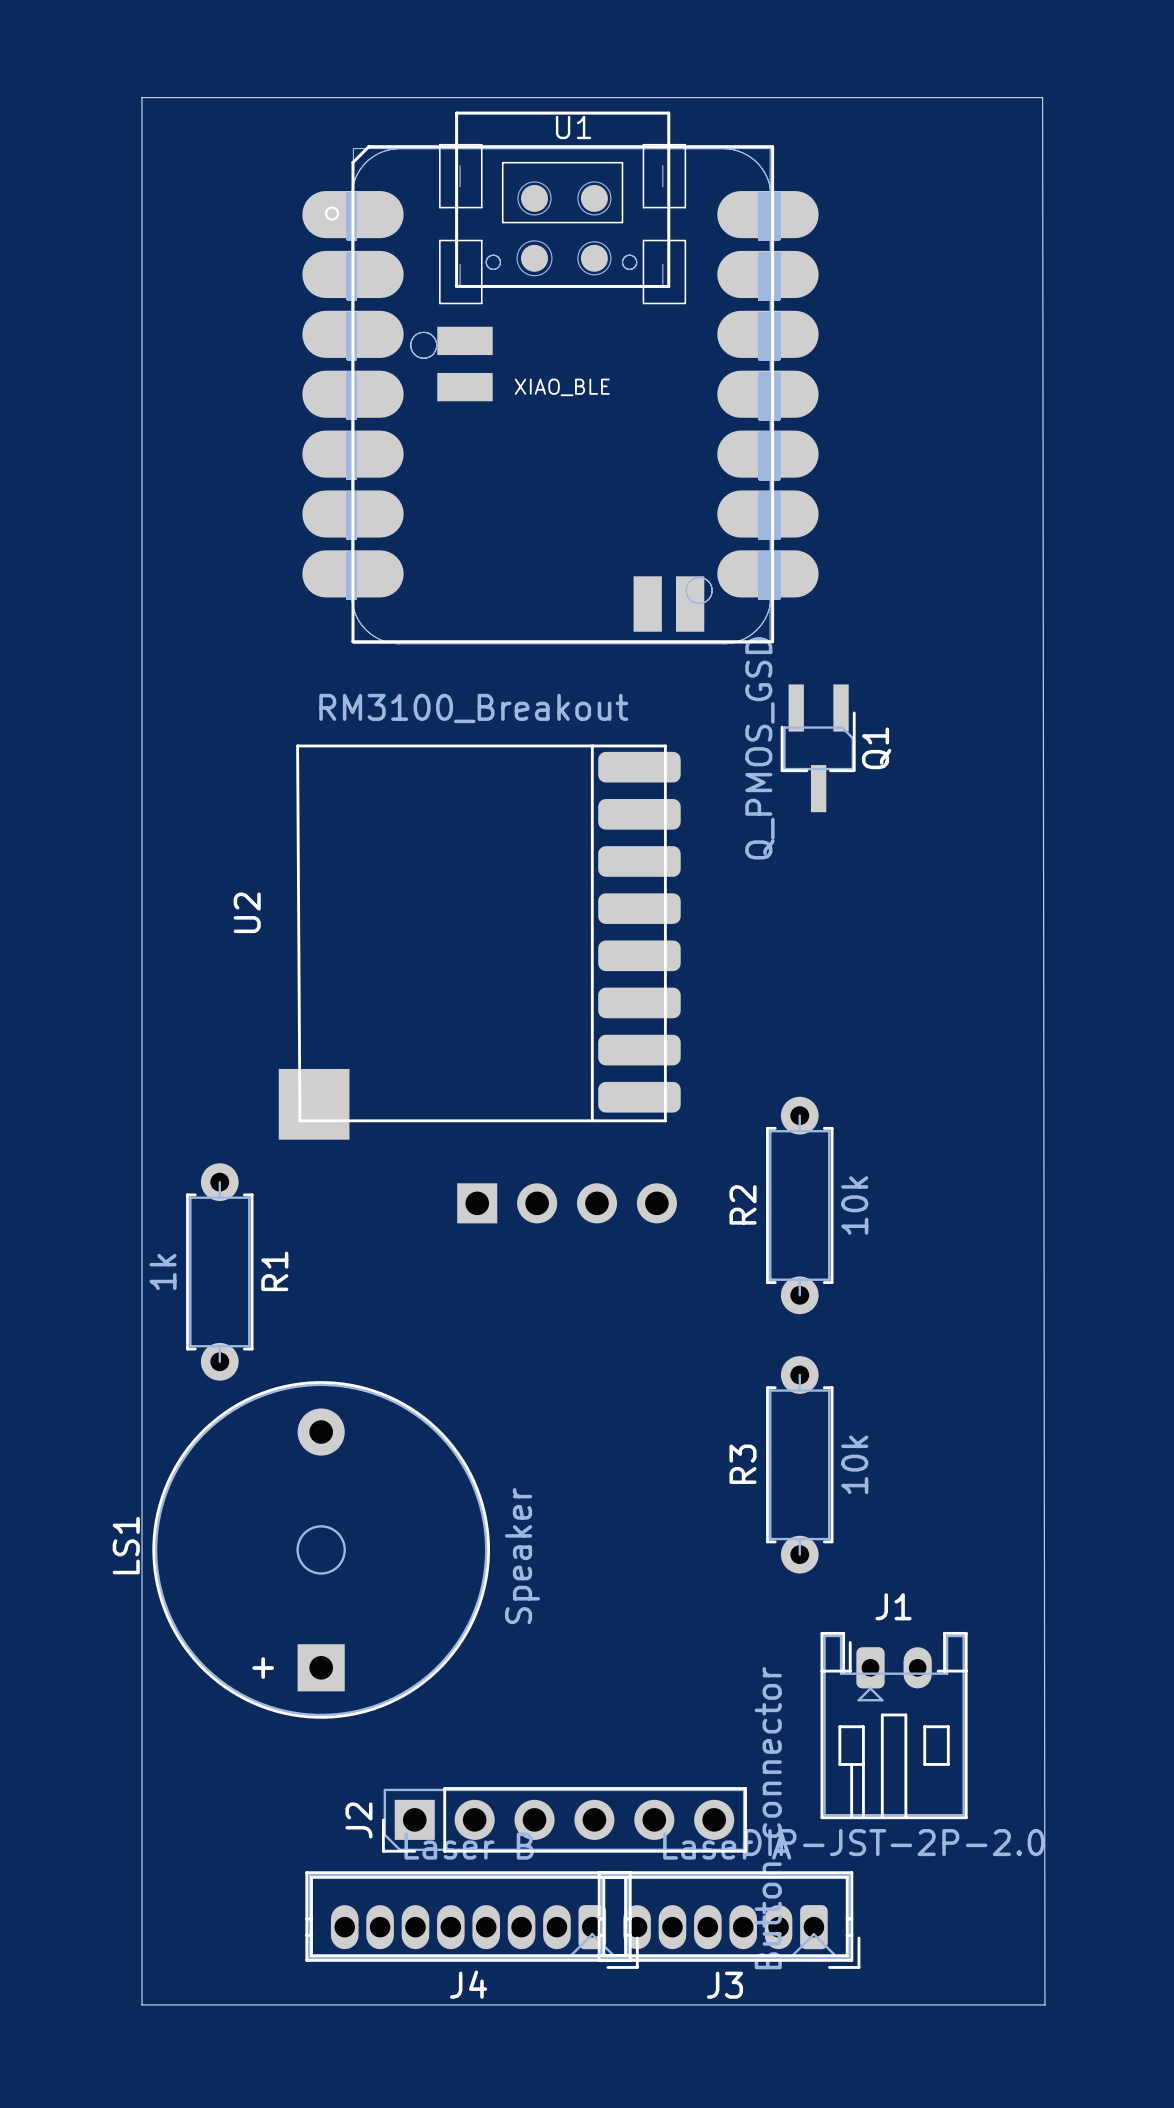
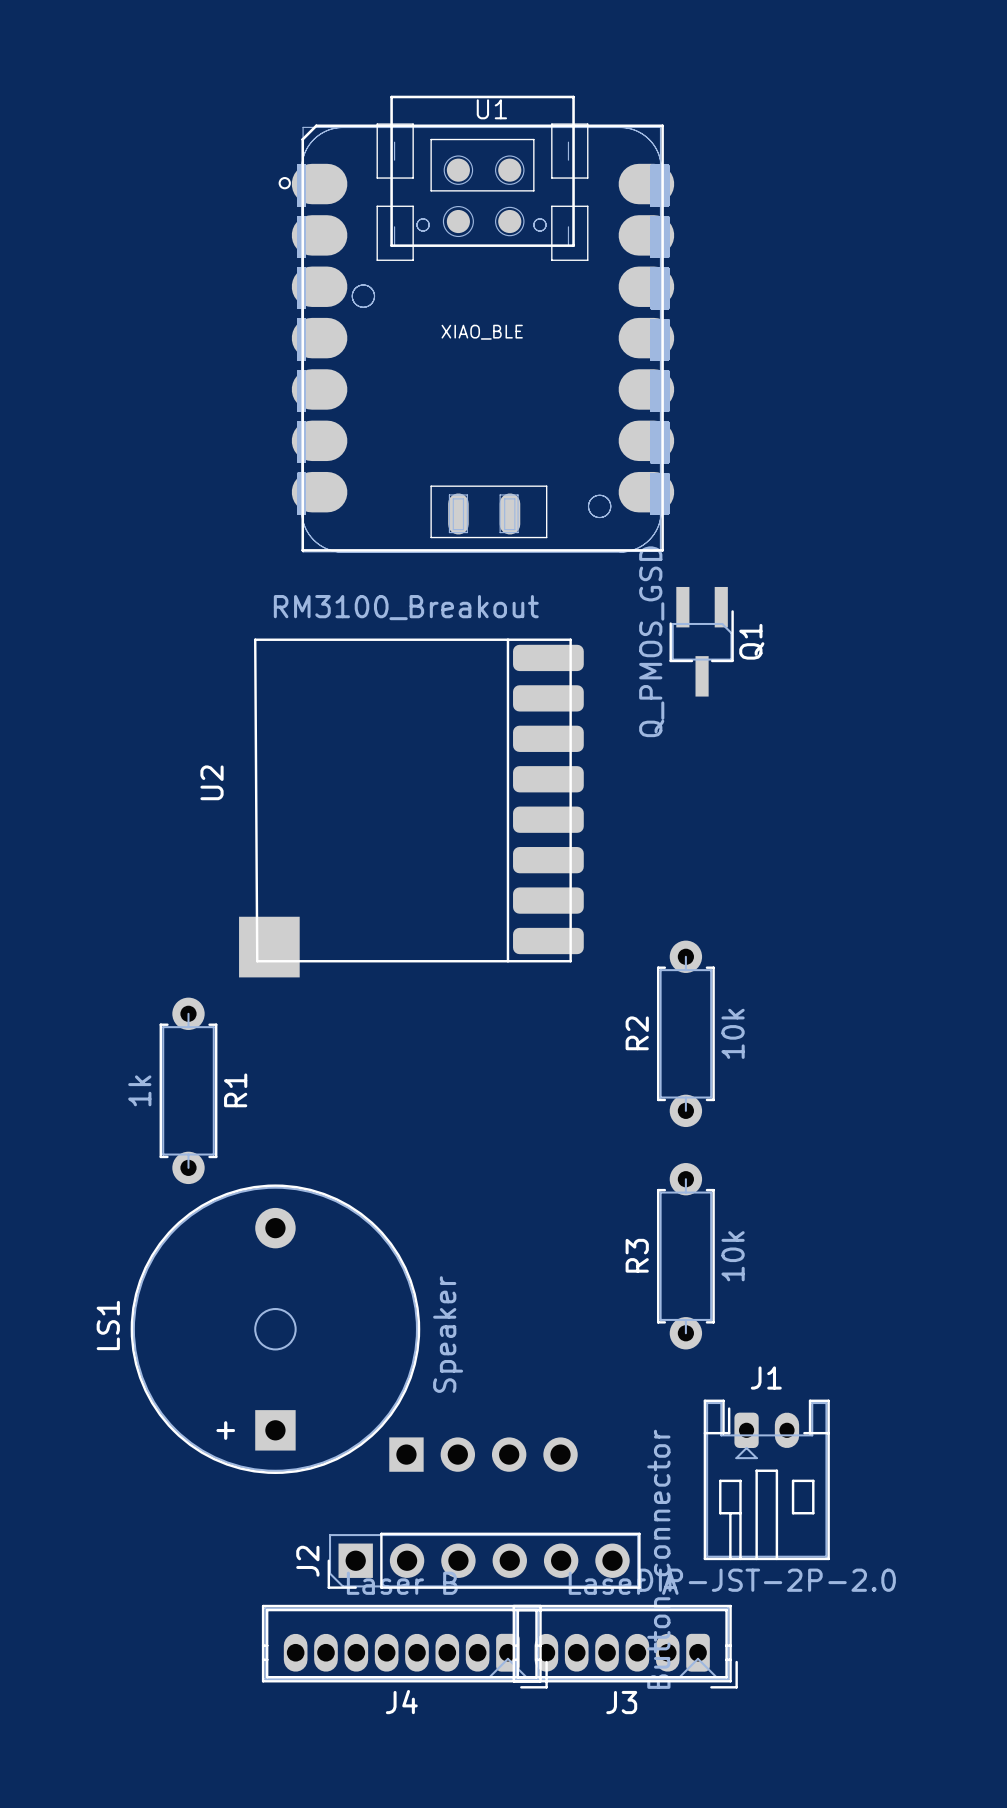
board edge: (141, 97) (141, 2004) (1044, 2004) (1042, 97) (141, 97) -> none
U1 footprint: [302, 111, 819, 645] -> [278, 95, 675, 553]
part position: (567, 1203) -> (483, 1454)

